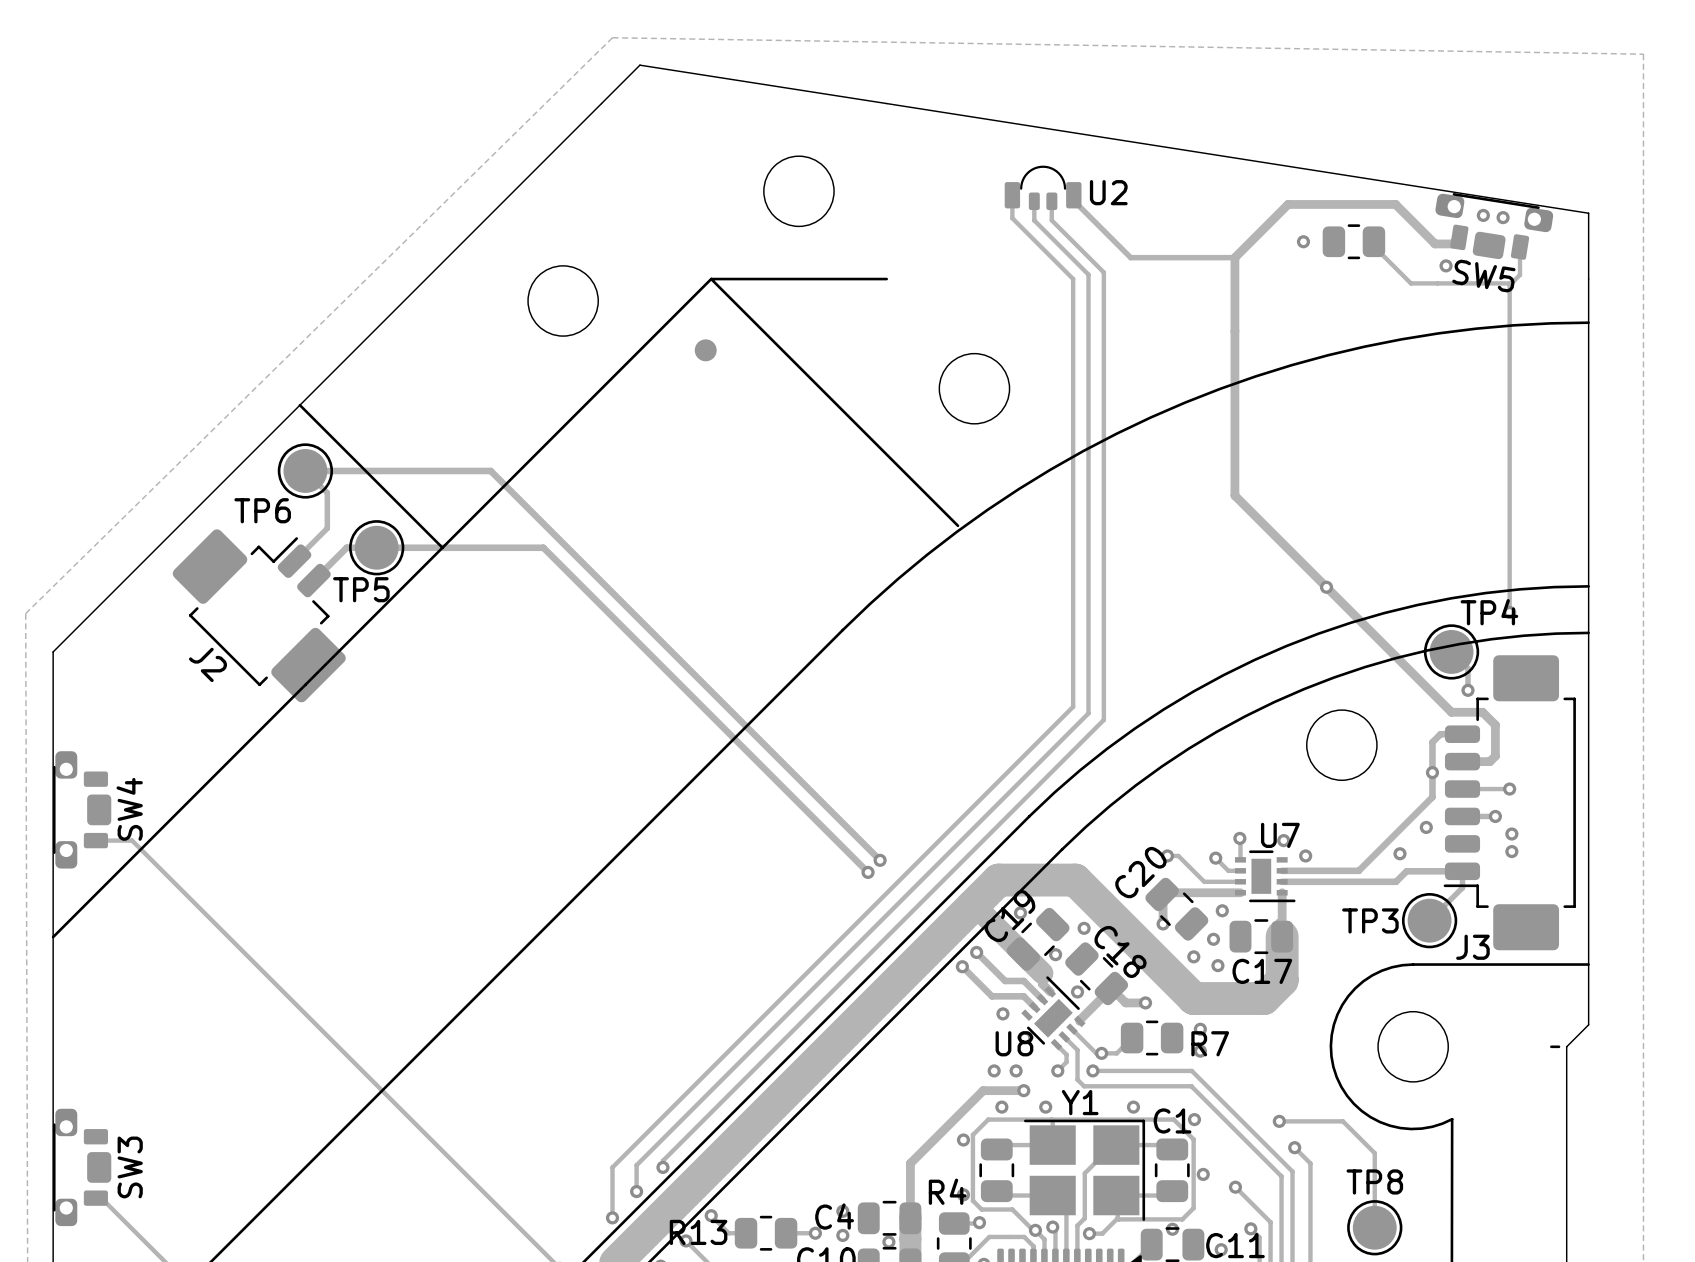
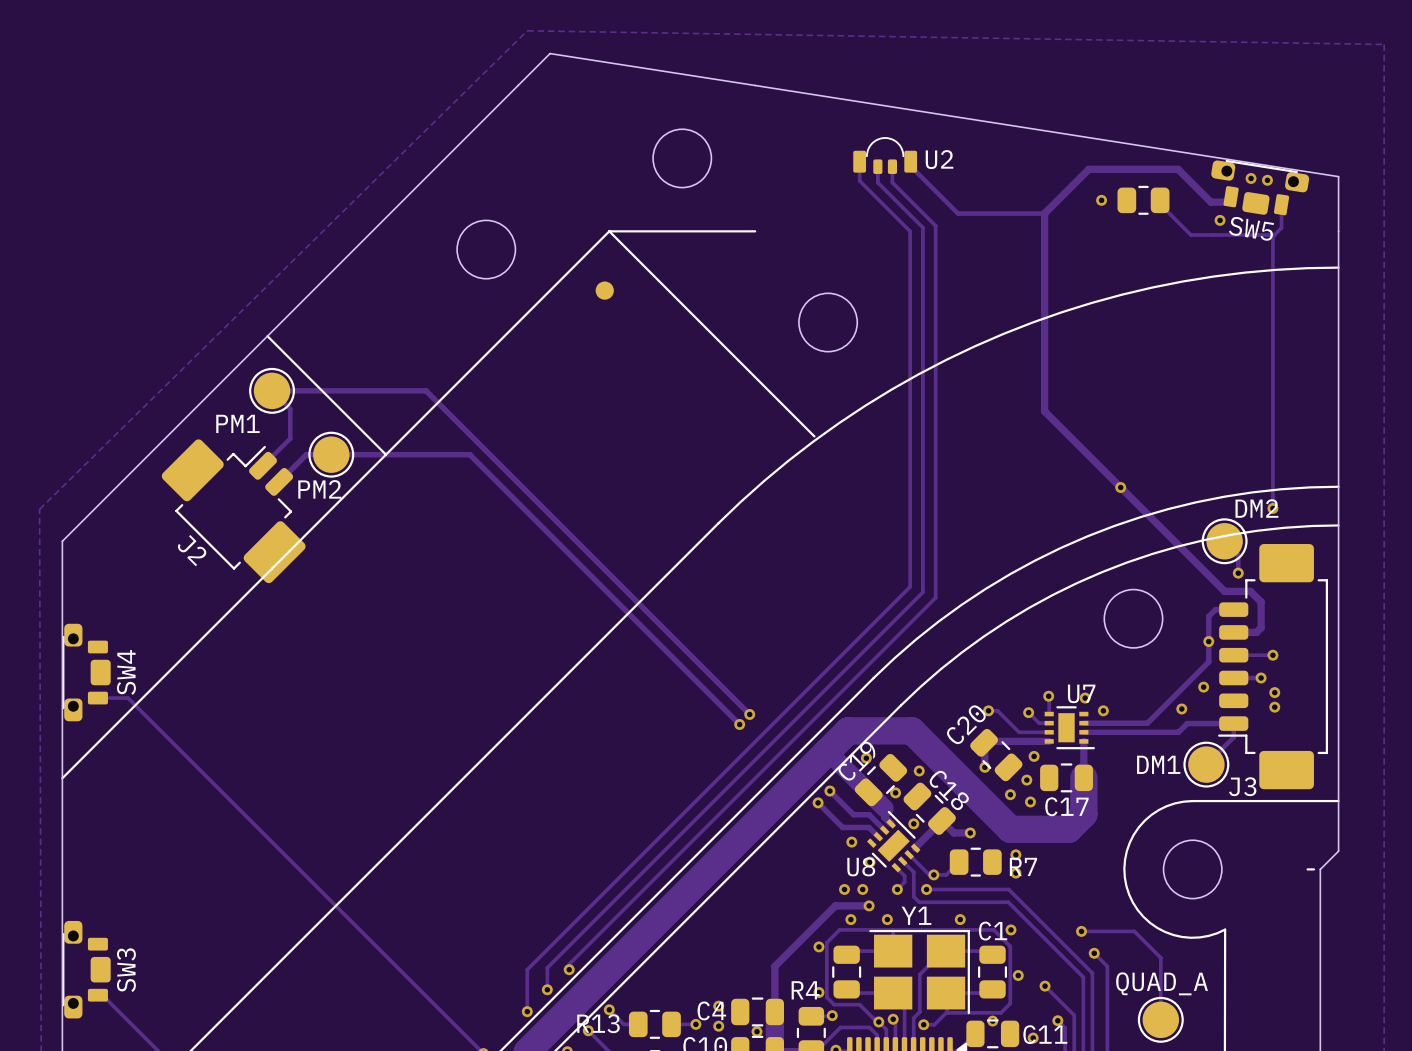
TP6 name: TP6 (262, 510) -> PM1 (237, 423)
TP5 name: TP5 (361, 589) -> PM2 (319, 489)
TP4 name: TP4 (1489, 612) -> DM2 (1256, 508)
TP3 name: TP3 (1370, 920) -> DM1 (1158, 764)
TP8 name: TP8 (1374, 1181) -> QUAD_A (1162, 983)

